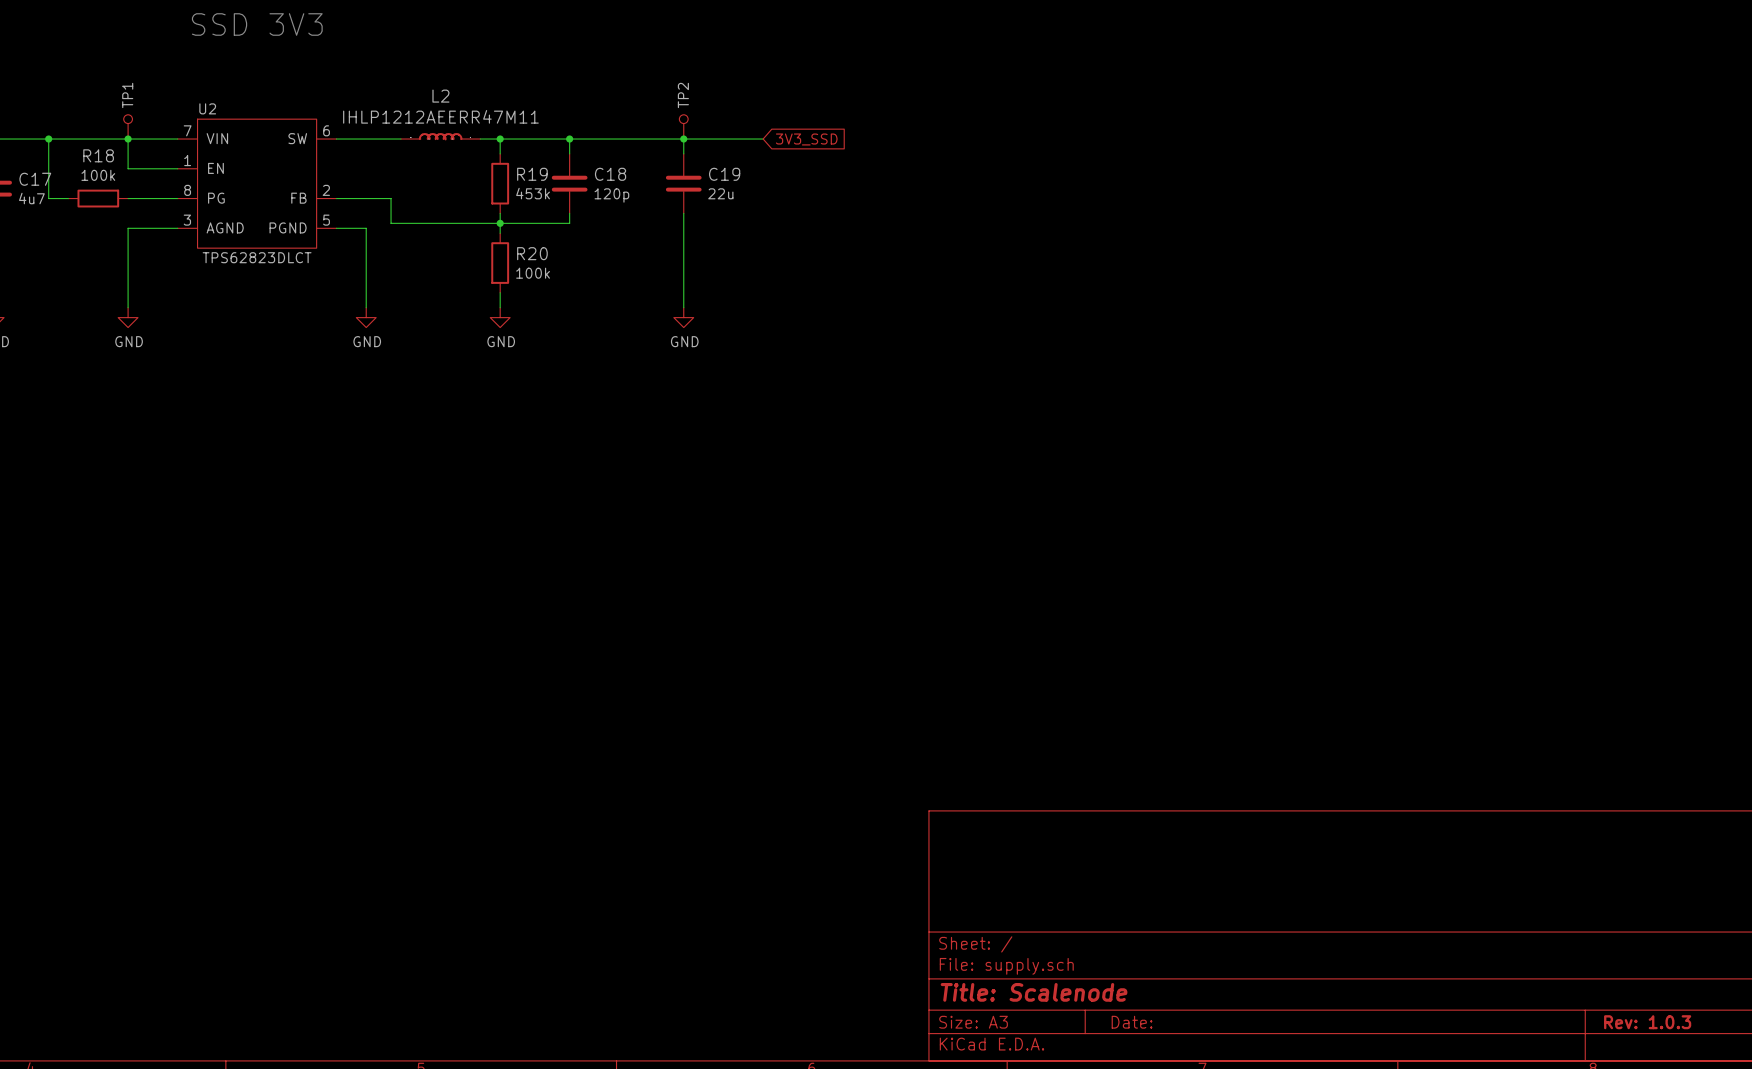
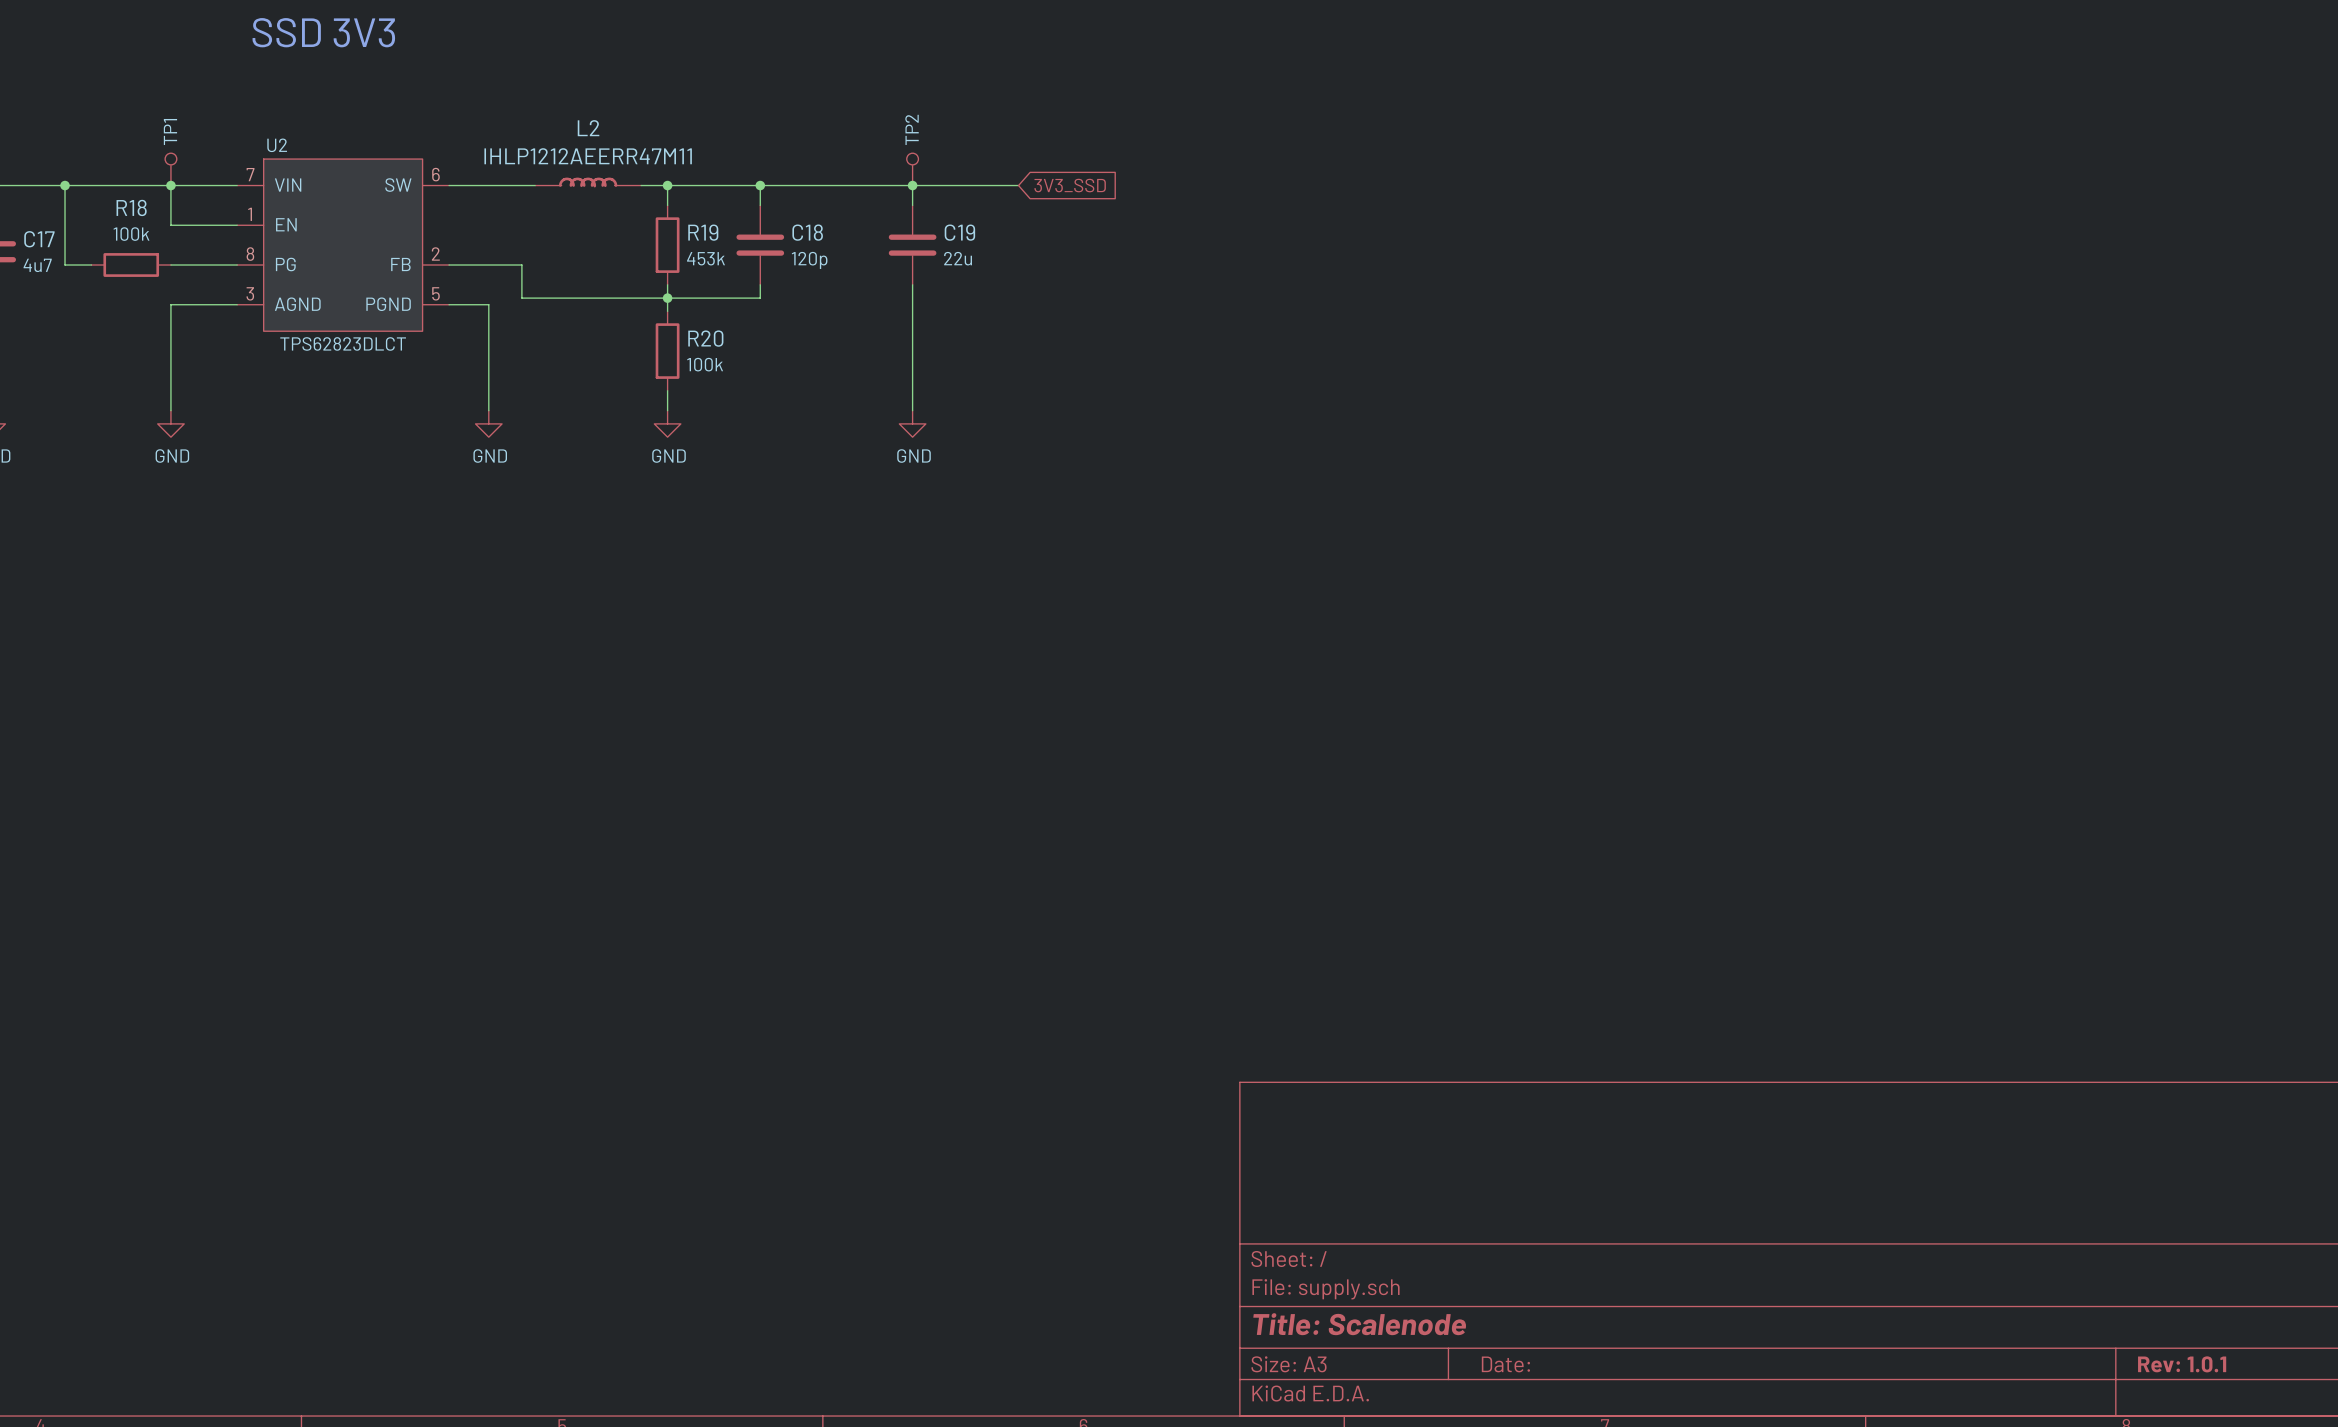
title block: Rev: 1.0.3 (1647, 1022) -> Rev: 1.0.1 (2182, 1364)

